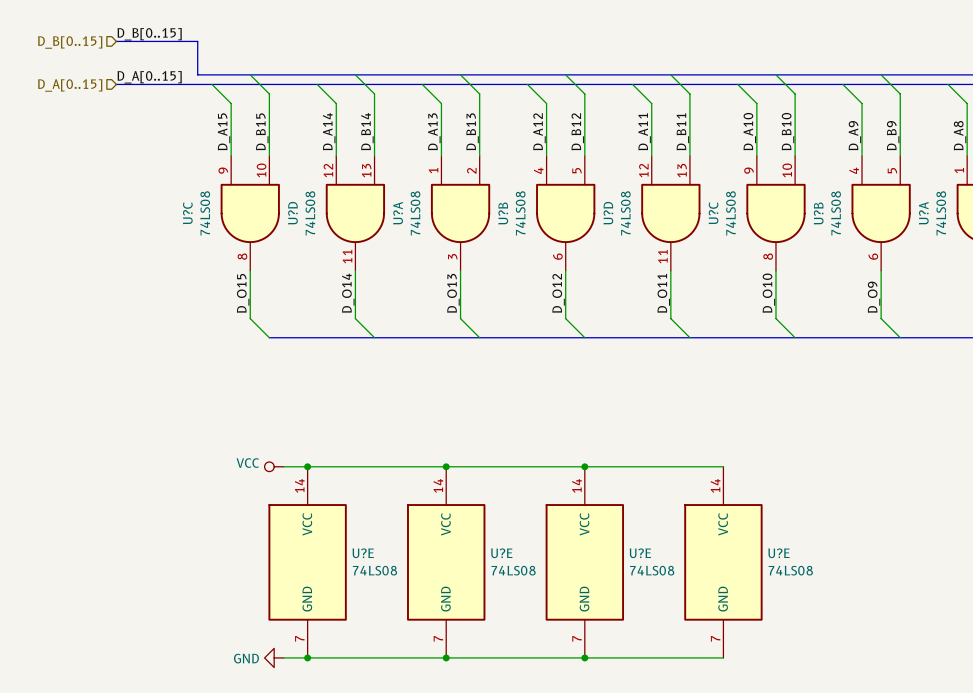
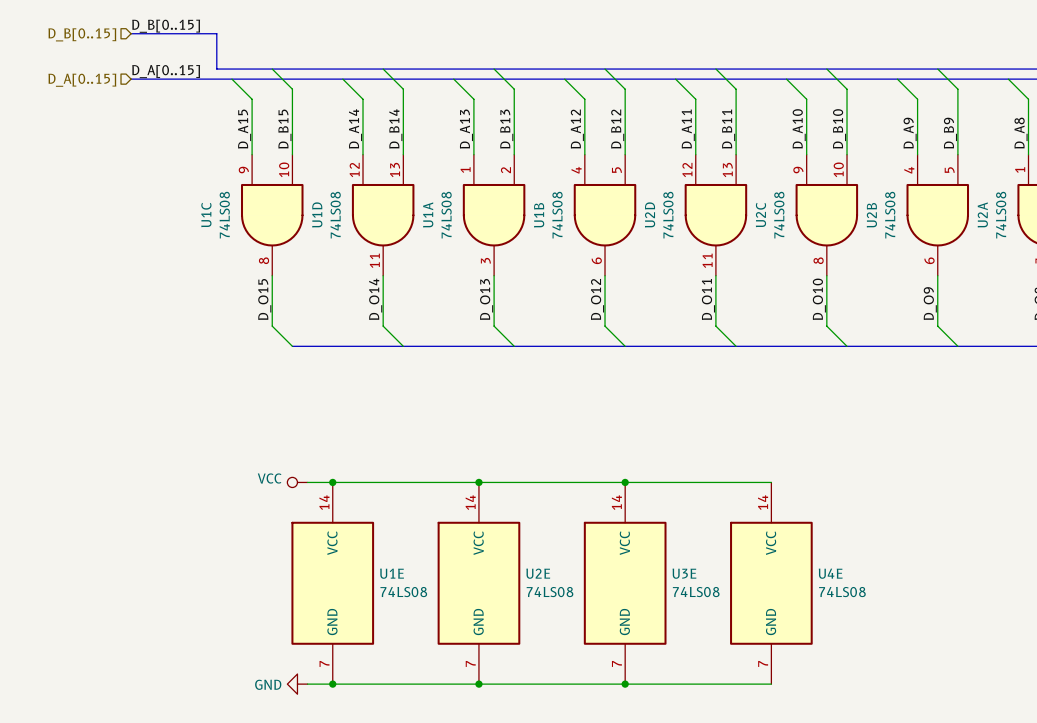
U?C name: U?C (187, 213) -> U1C (206, 214)
U?D name: U?D (292, 213) -> U1D (317, 214)
U?A name: U?A (398, 213) -> U1A (428, 214)
U?B name: U?B (503, 213) -> U1B (539, 215)
U?D name: U?D (608, 213) -> U2D (650, 214)
U?C name: U?C (713, 213) -> U2C (760, 214)
U?B name: U?B (818, 213) -> U2B (871, 215)
U?A name: U?A (923, 213) -> U2A (982, 214)
U?E name: U?E (363, 553) -> U1E (392, 573)
U?E name: U?E (501, 553) -> U2E (538, 573)
U?E name: U?E (640, 553) -> U3E (684, 573)
U?E name: U?E (779, 553) -> U4E (830, 573)

